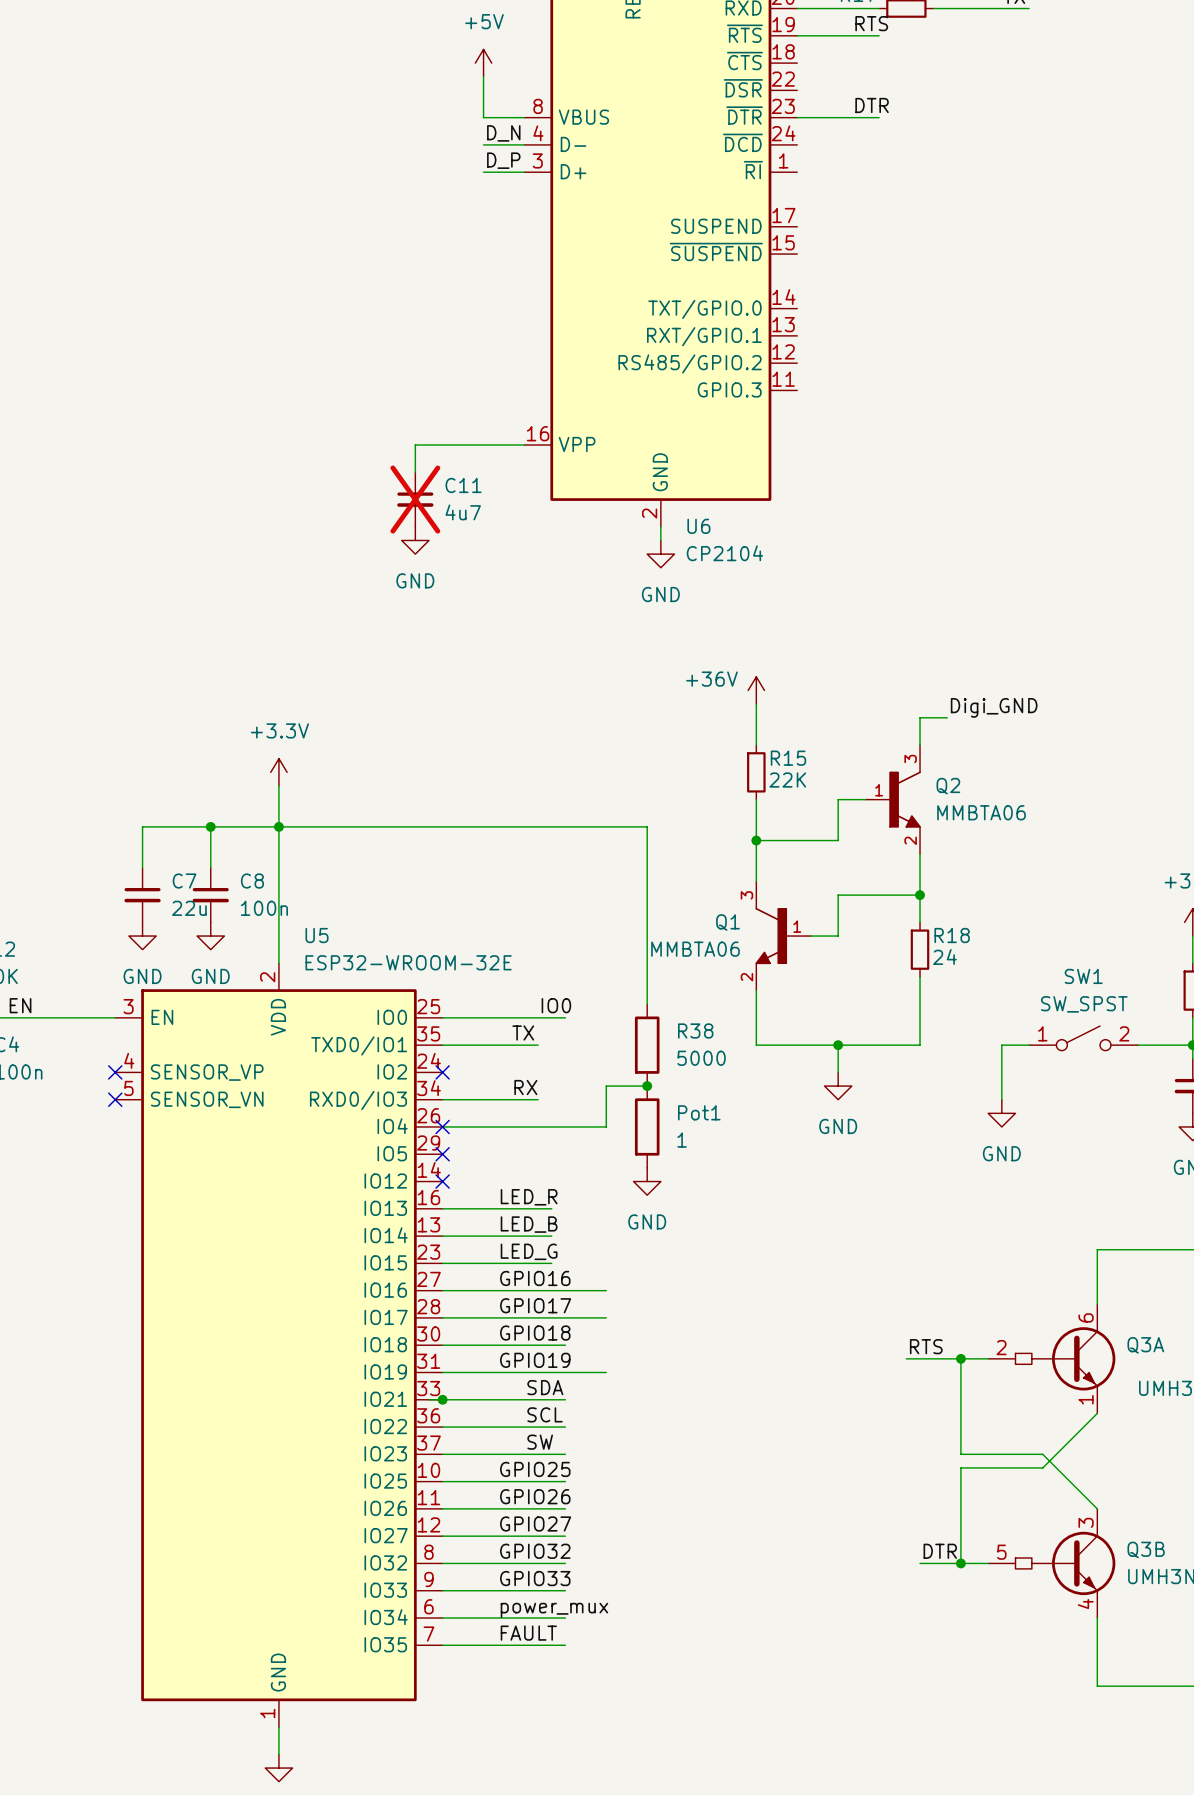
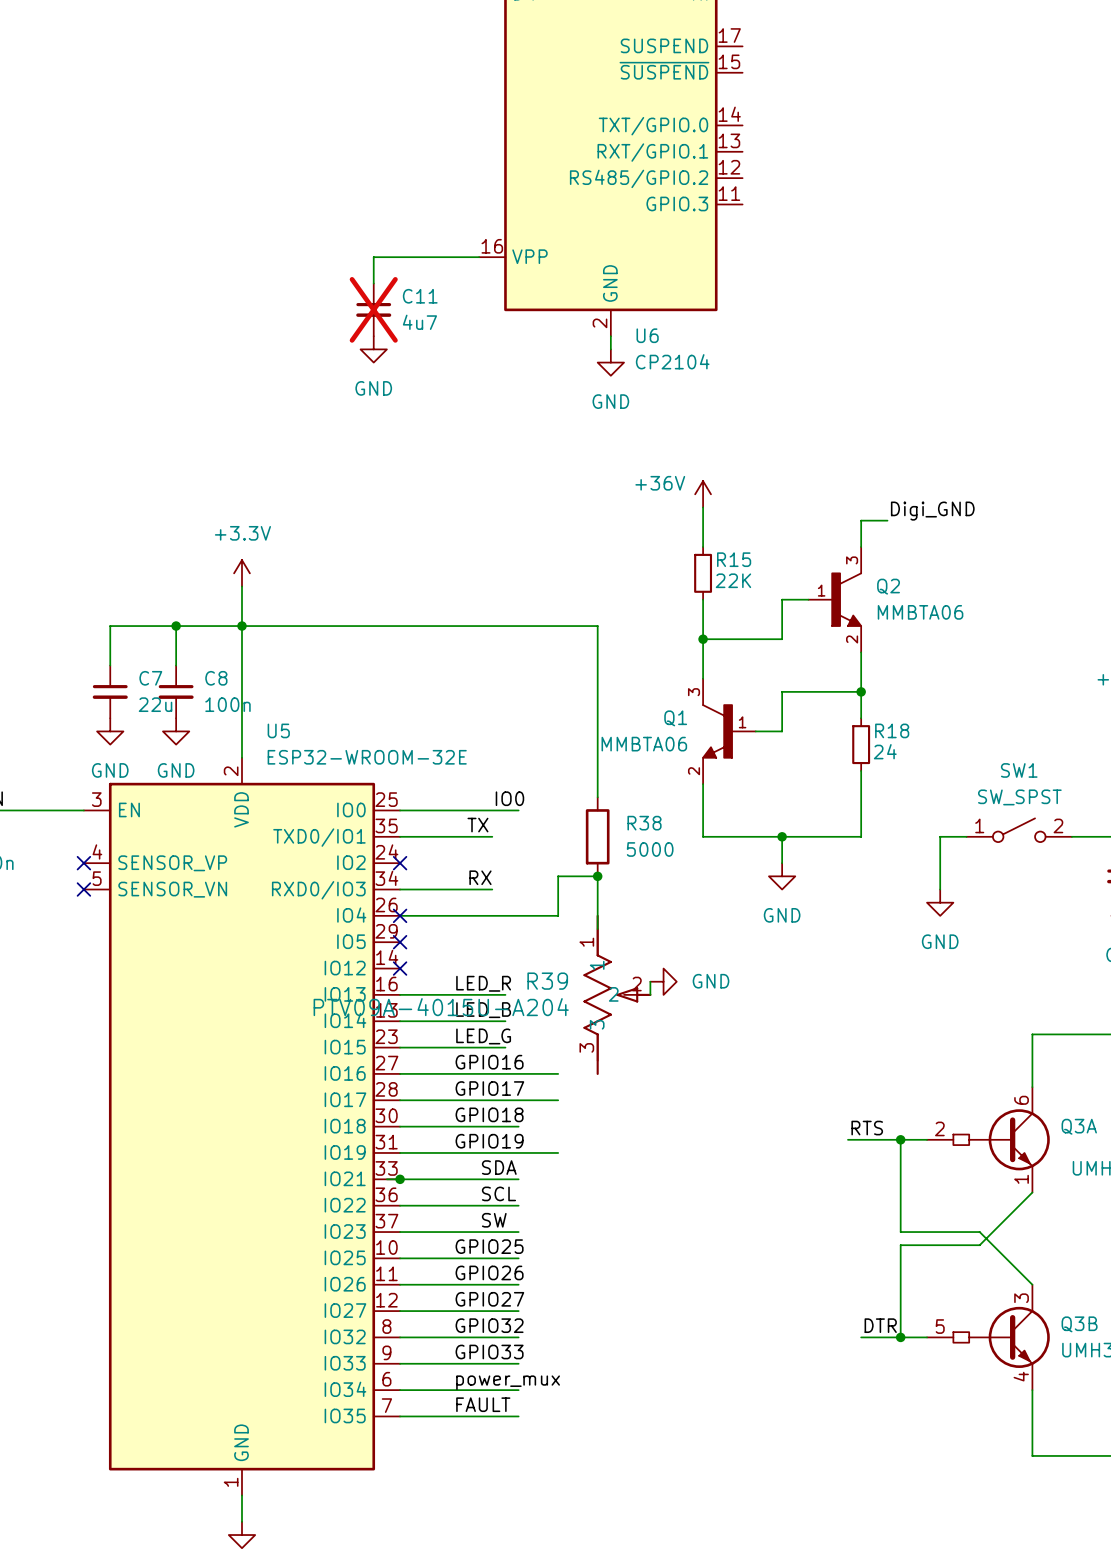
wire: none -> (597, 876) (597, 929)
Pot1: 1 (647, 1126) -> none
power symbol rotation: 0° (647, 1181) -> 90° counterclockwise (663, 981)
power symbol position: GND (647, 1181) -> GND (663, 981)
wire: none -> (650, 981) (650, 994)
R39: none -> PTV09A-4015U-A204 (617, 994)

